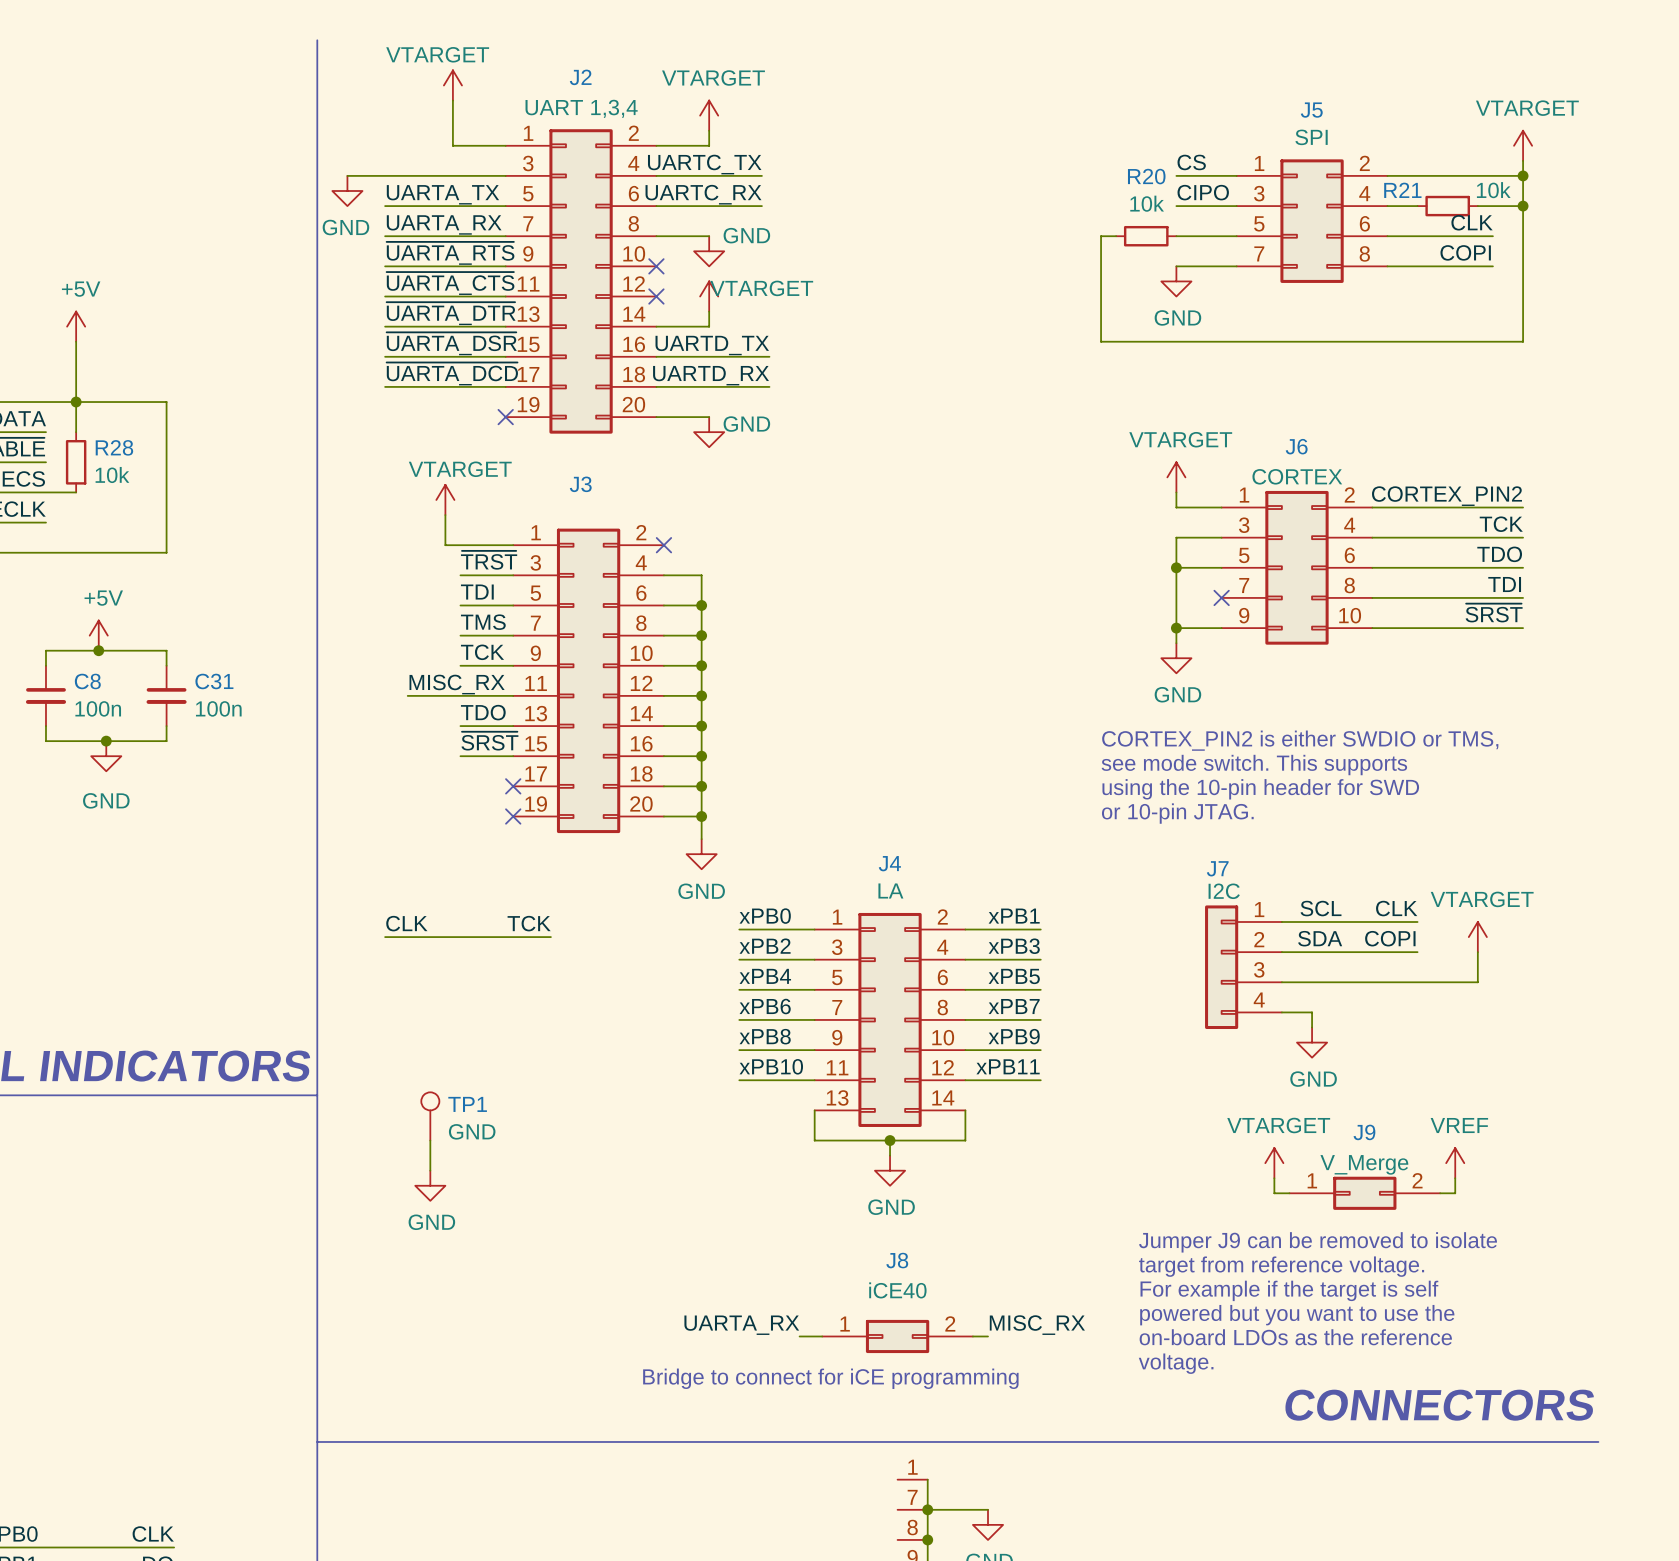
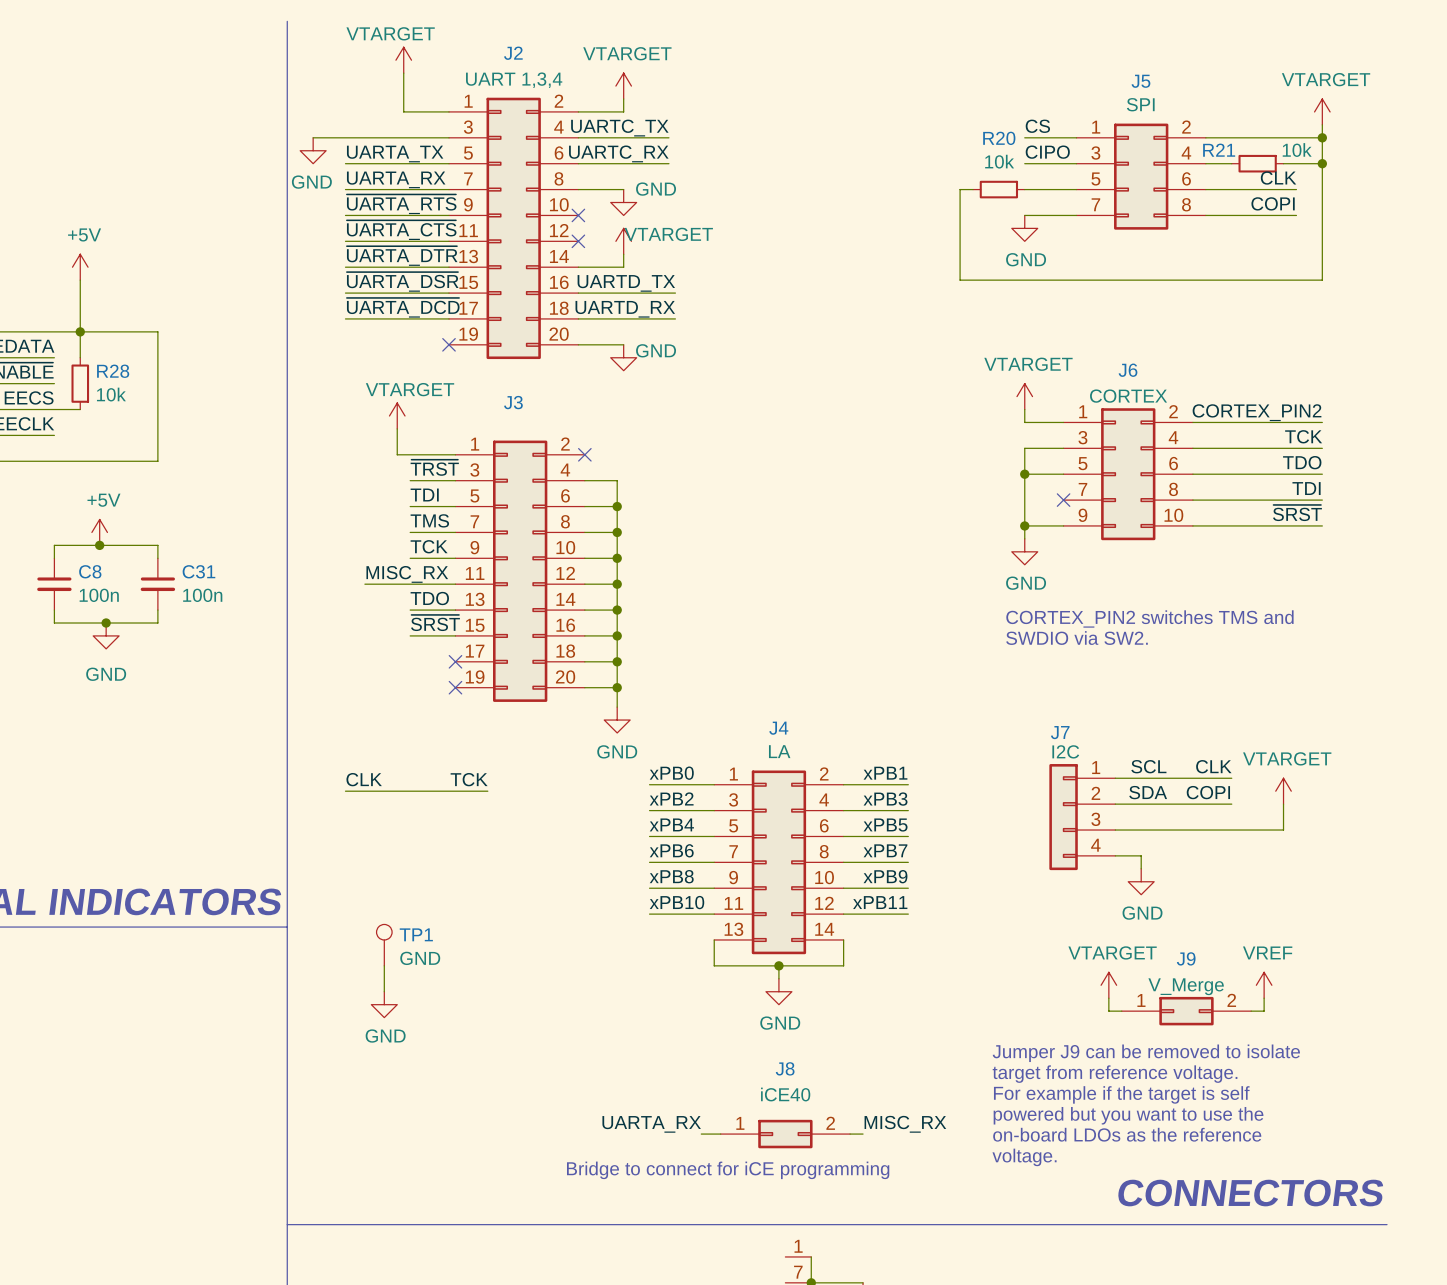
text: CORTEX_PIN2 is either SWDIO or TMS, (1300, 740) -> CORTEX_PIN2 switches TMS and (1149, 618)
text: none -> SWDIO via SW2. (1077, 638)
text: see mode switch. This supports (1254, 765) -> none
text: using the 10-pin header for SWD (1260, 789) -> none
text: or 10-pin JTAG. (1177, 813) -> none

